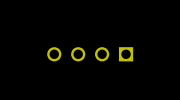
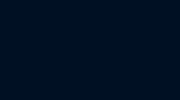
part: (90, 54) -> none

